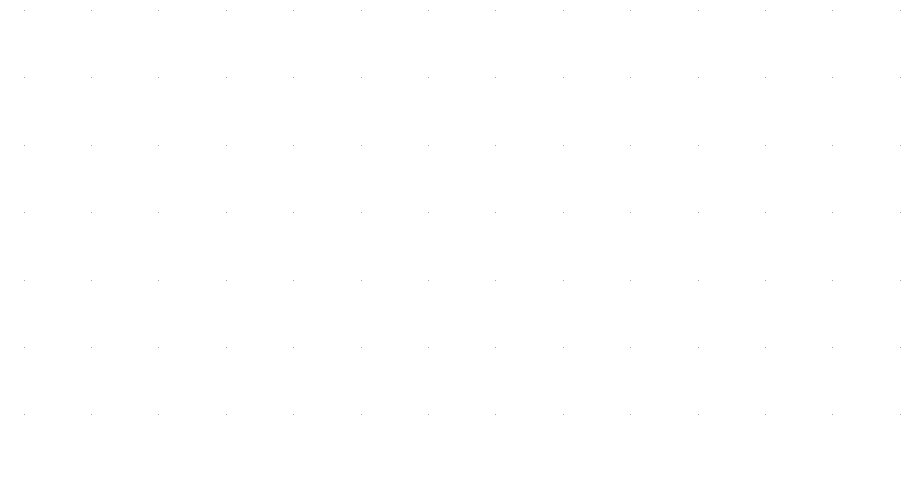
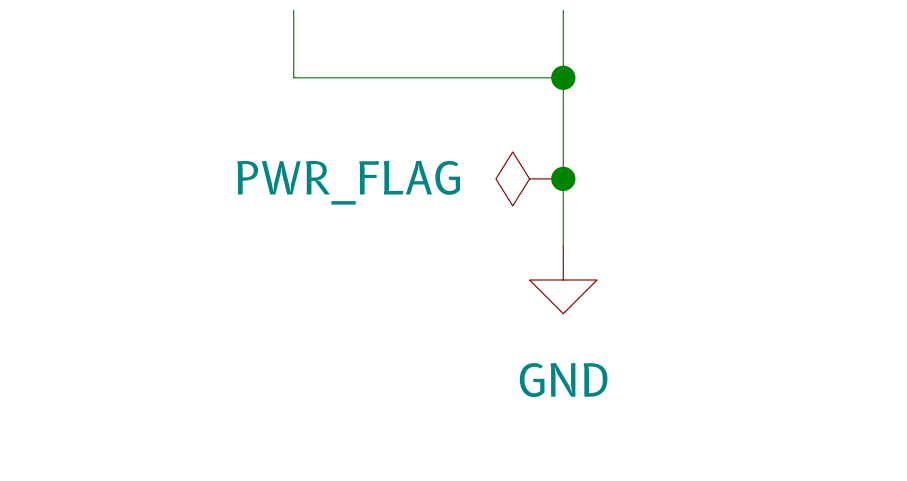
wire: none -> (293, 10) (293, 77) (563, 77)
wire: none -> (563, 10) (563, 246)
junction: none -> (563, 77)
power symbol: none -> PWR_FLAG (529, 178)
junction: none -> (563, 178)
power symbol: none -> GND (563, 280)

